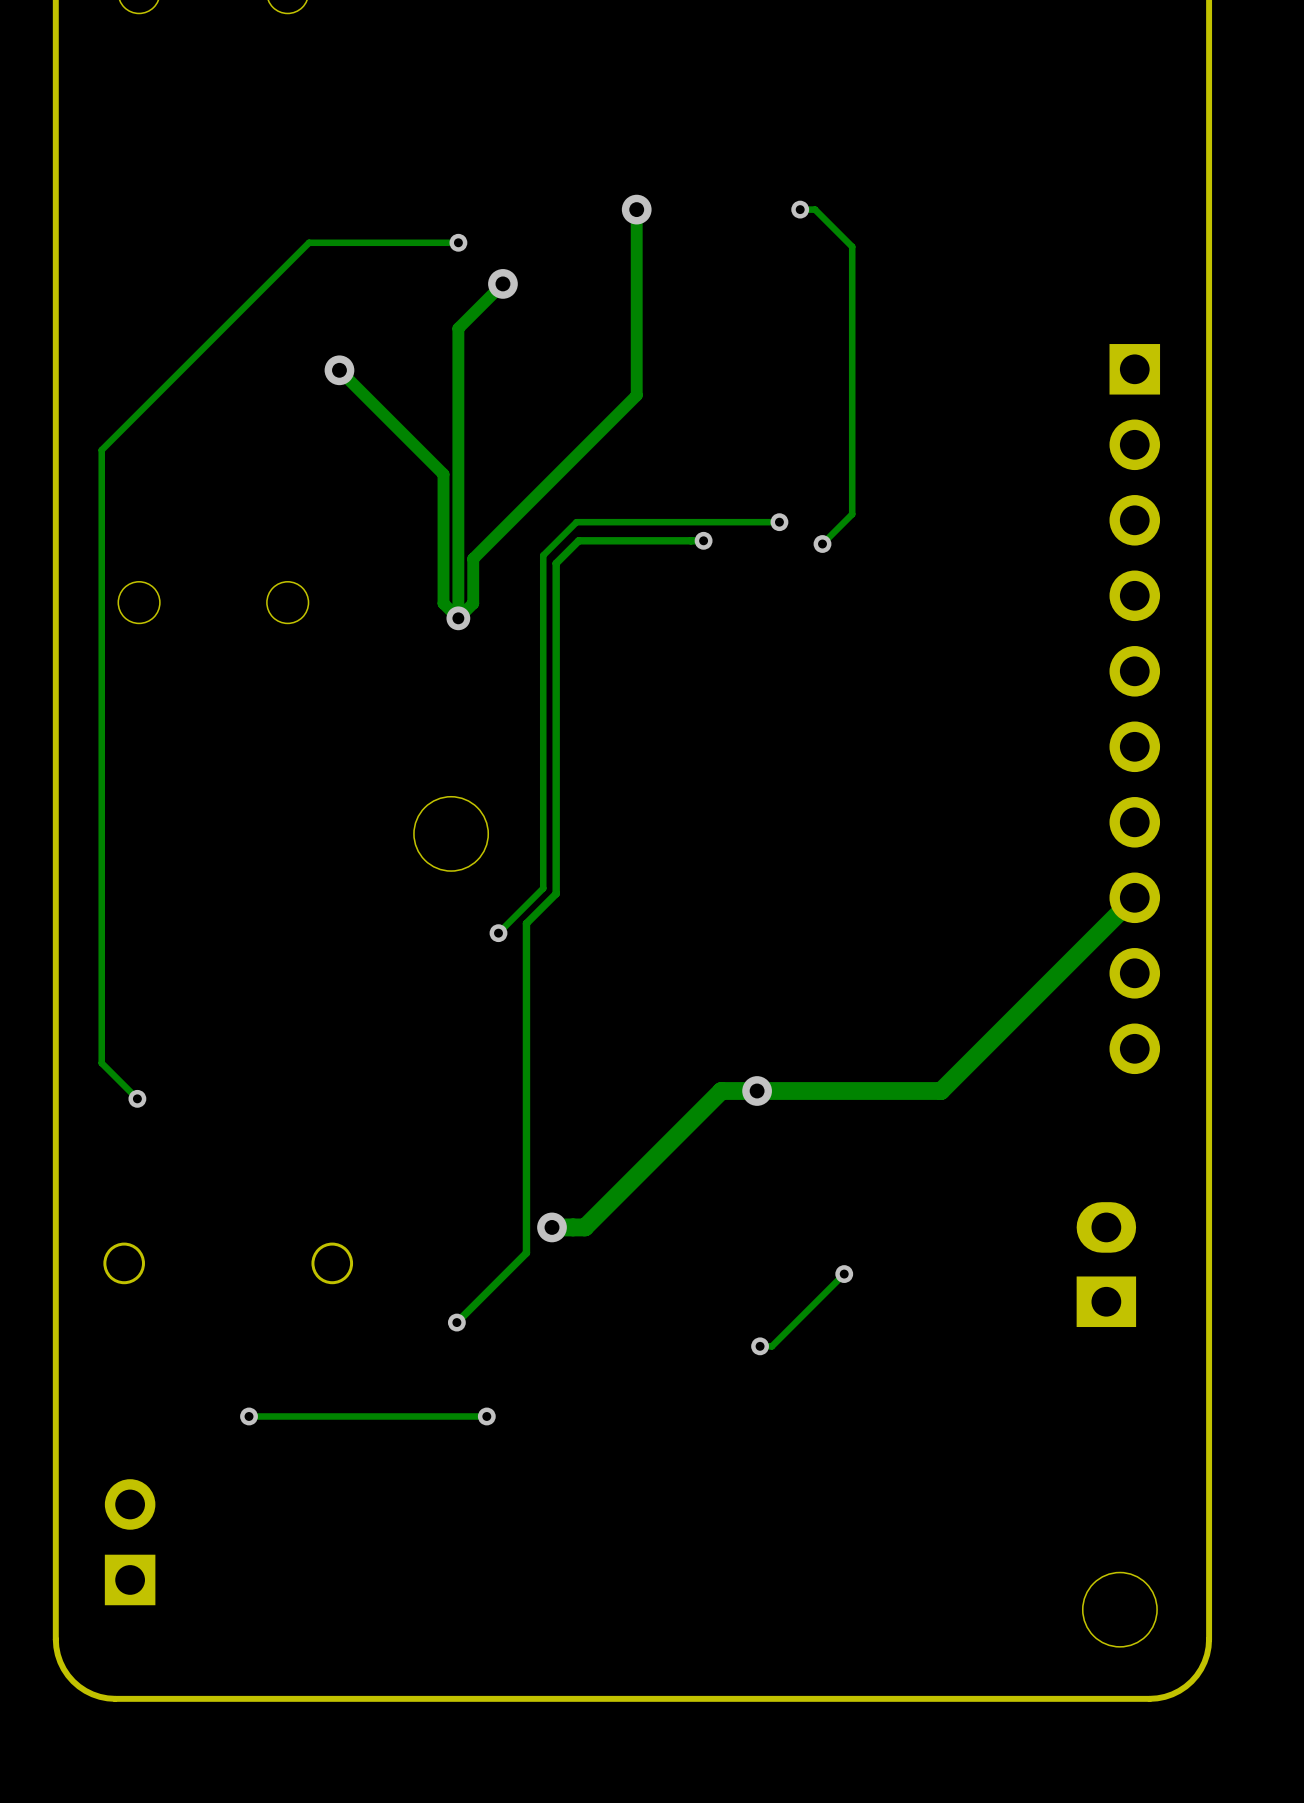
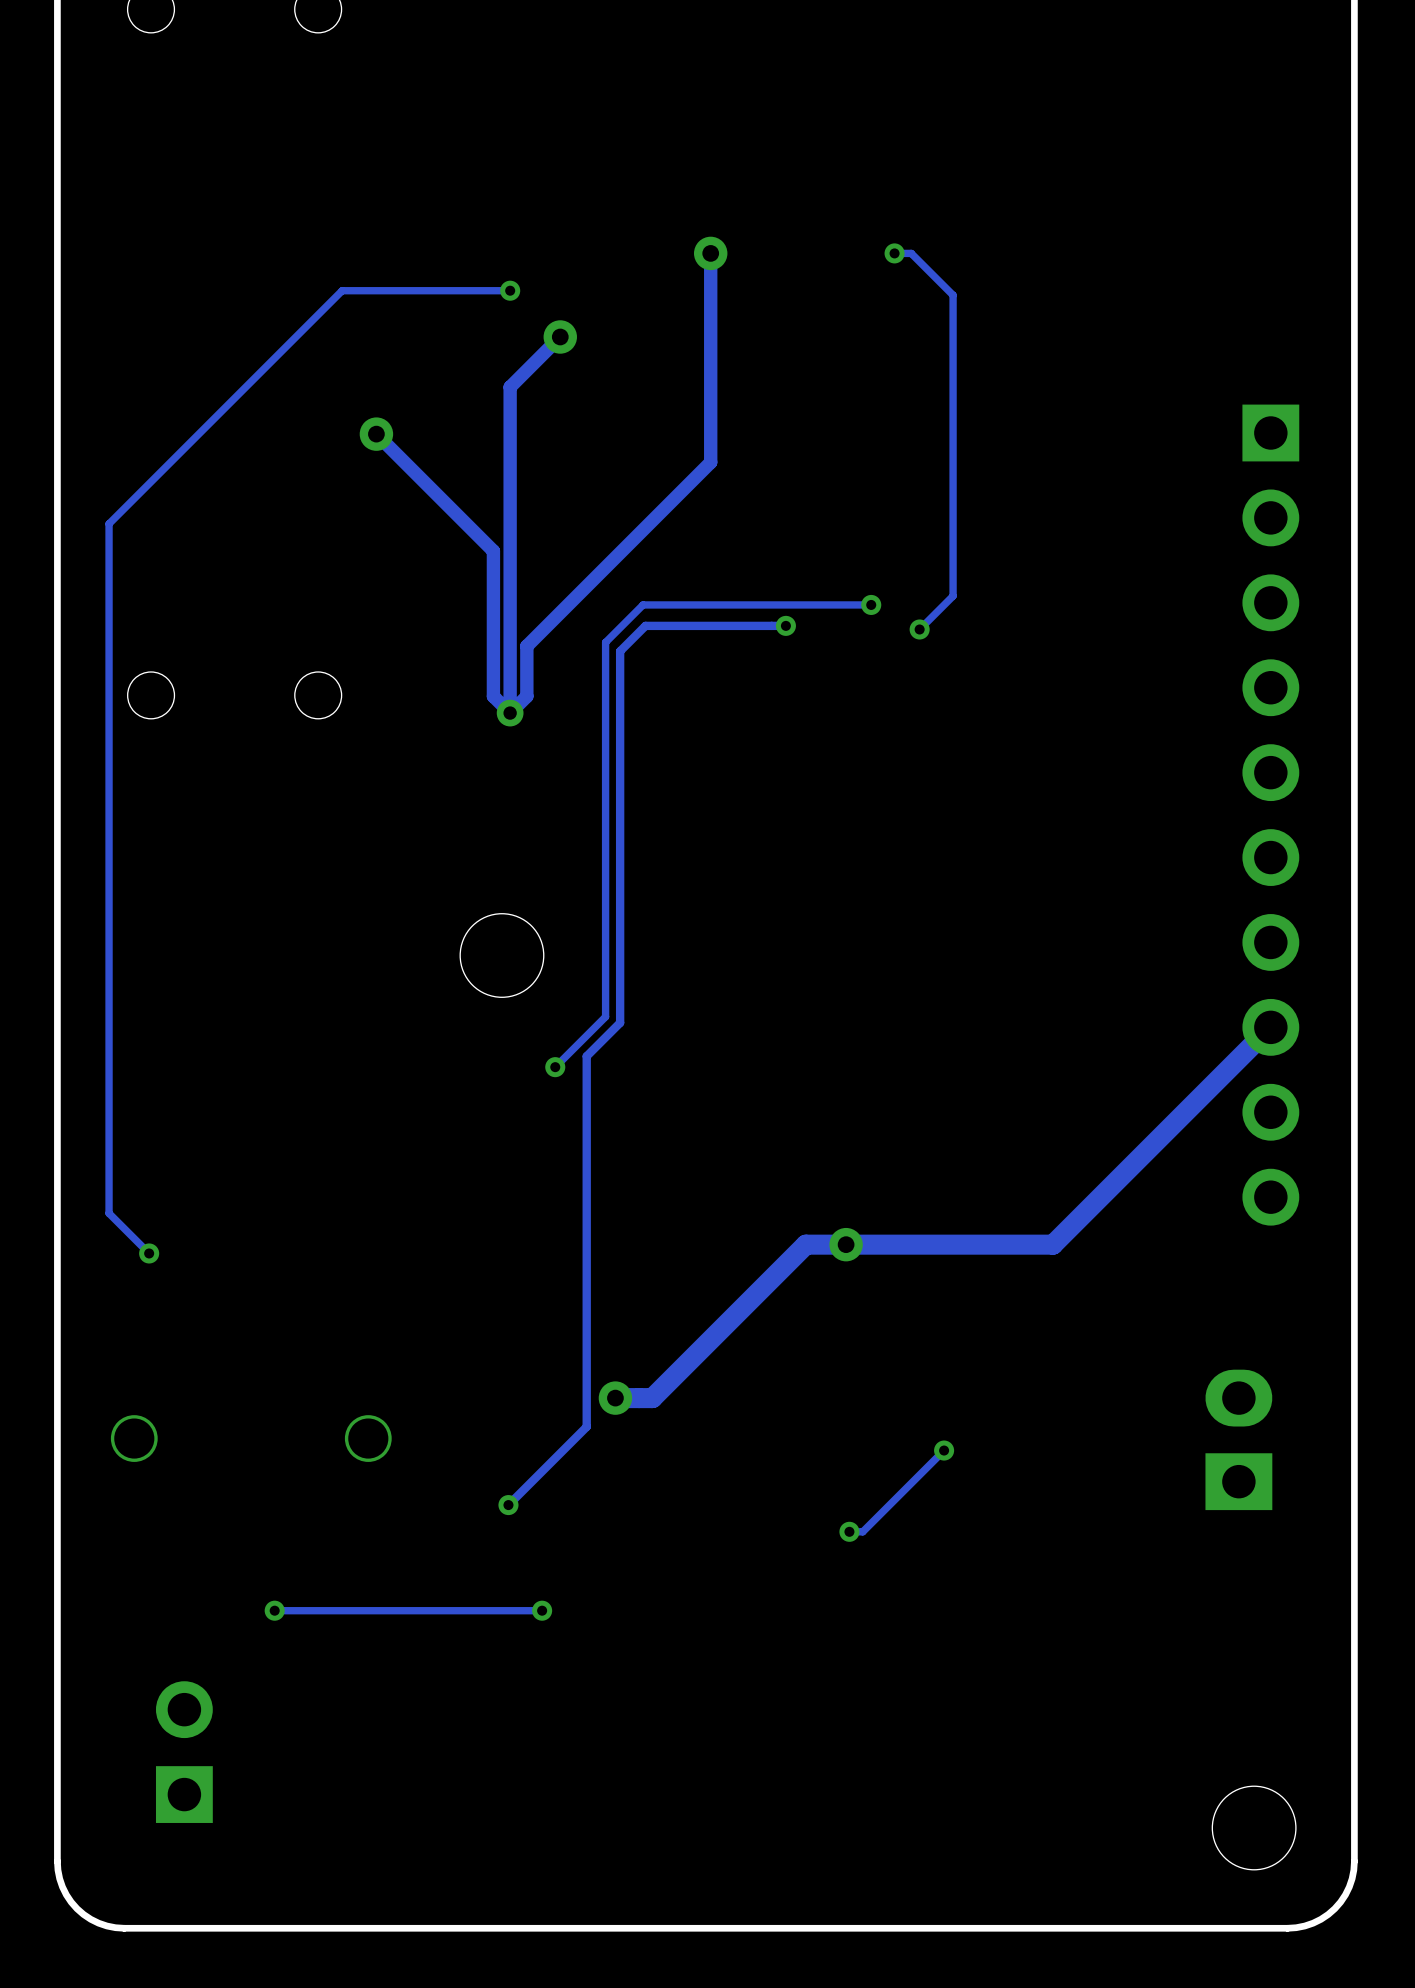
part position: (130, 1542) -> (184, 1752)

